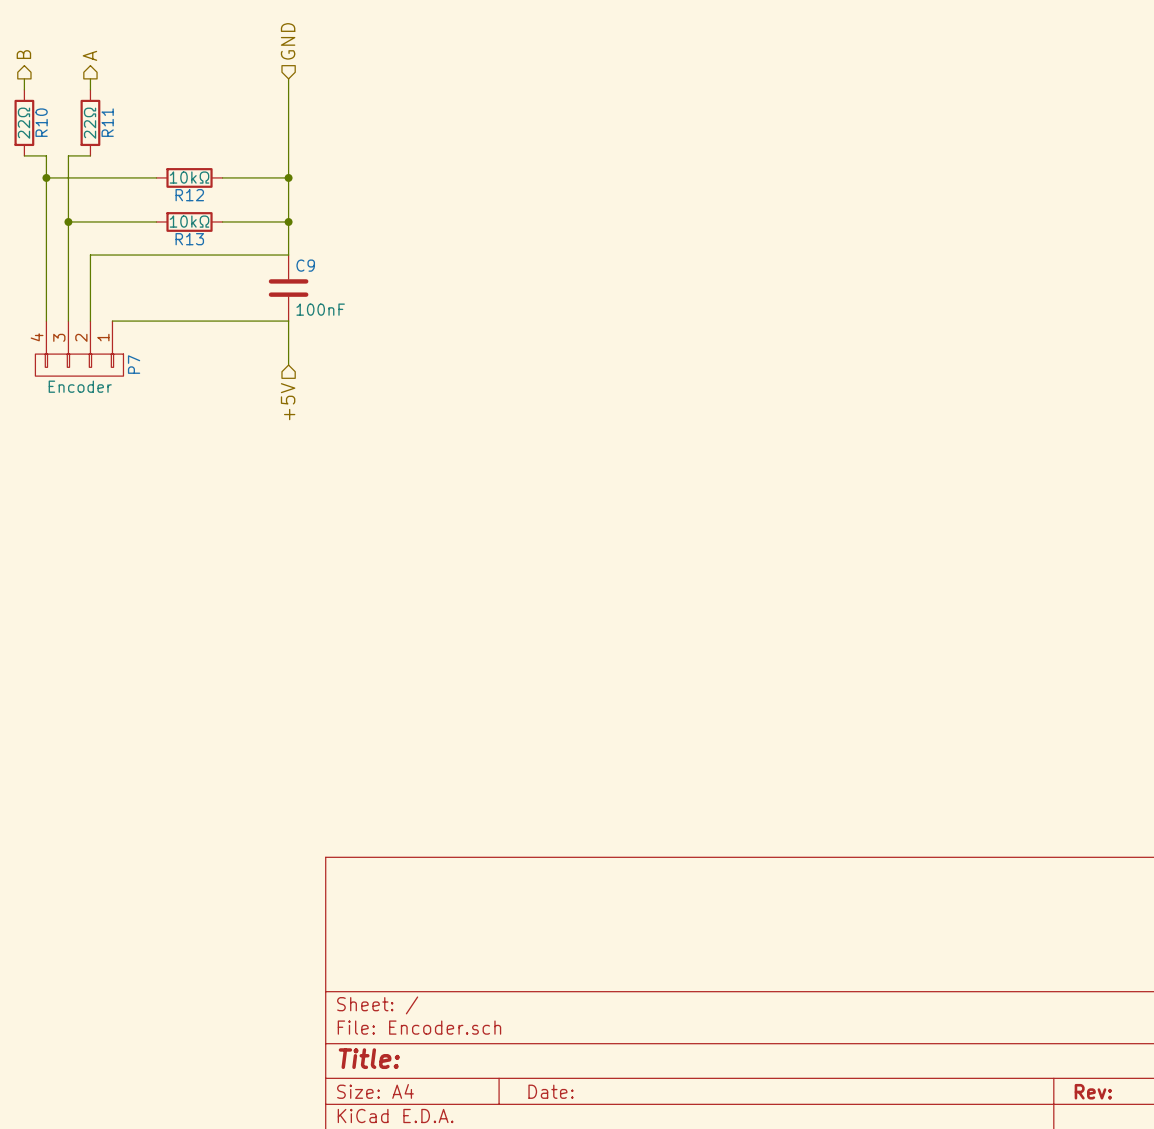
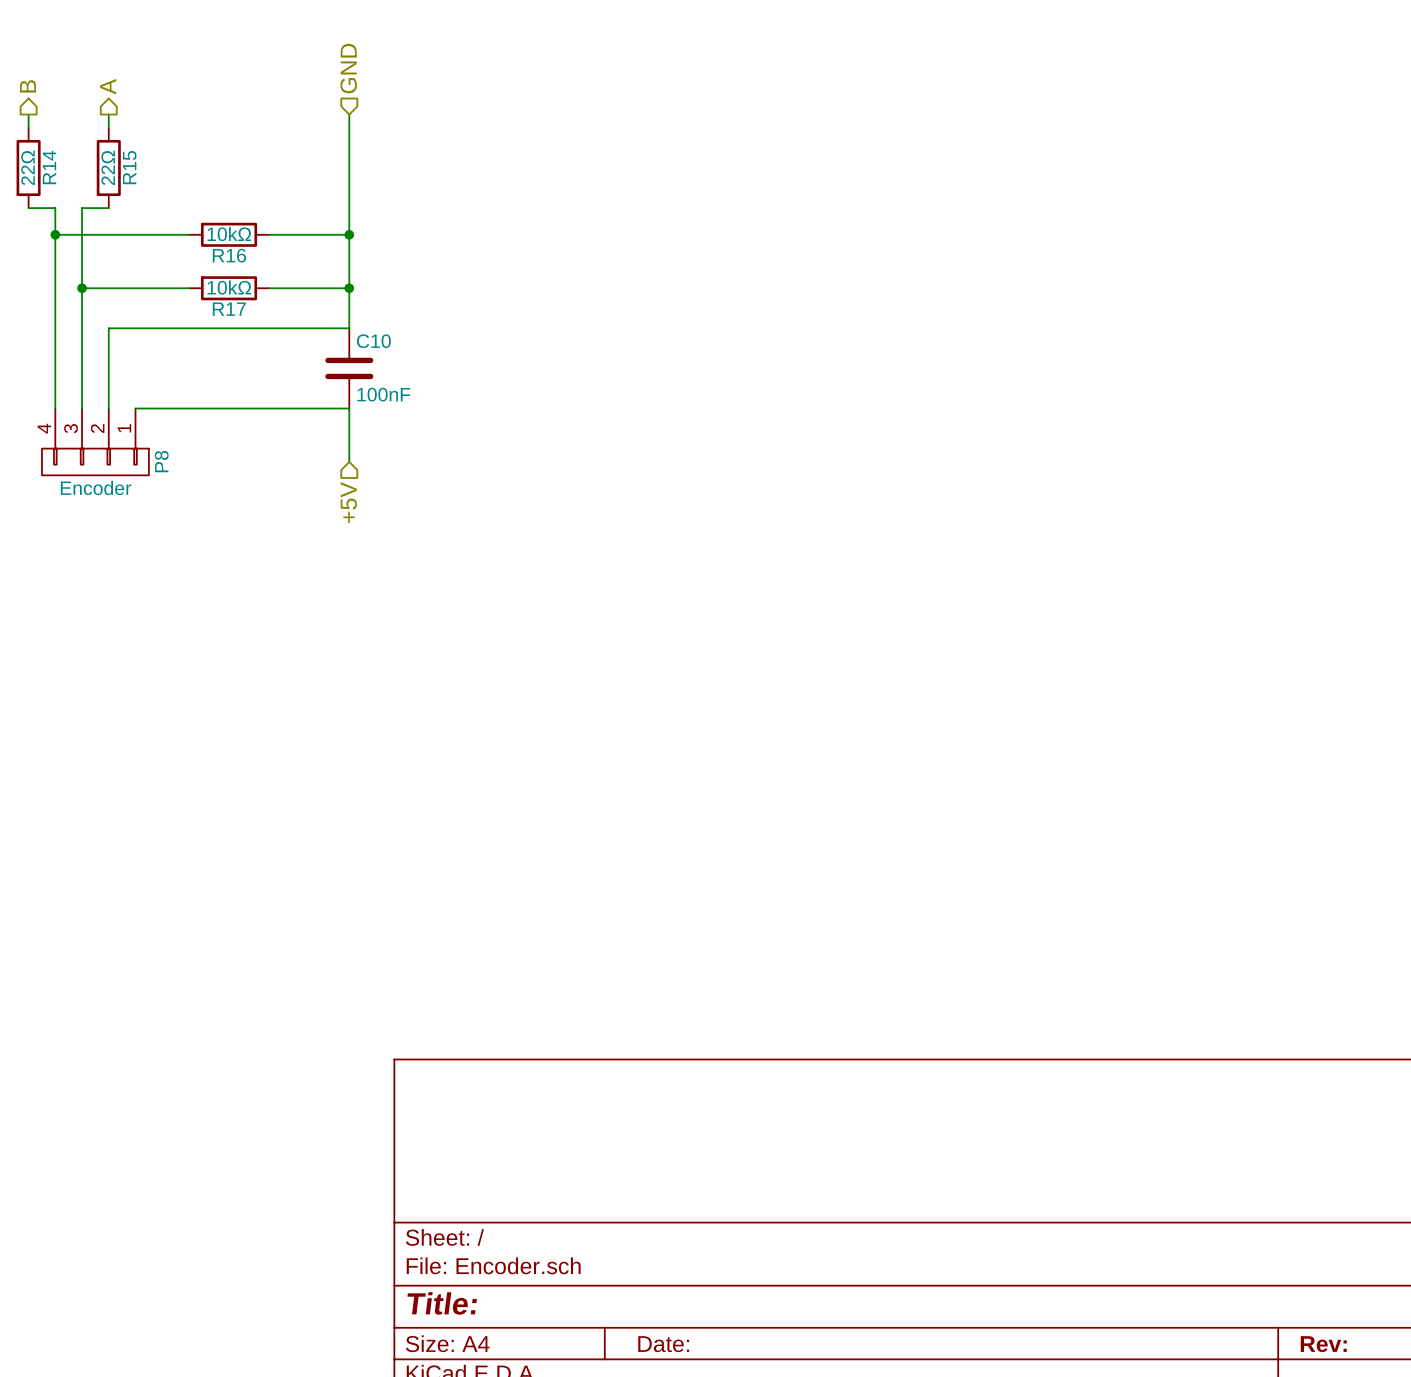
R10 name: R10 (41, 122) -> R14 (49, 167)
R11 name: R11 (107, 122) -> R15 (129, 167)
R12 name: R12 (189, 195) -> R16 (229, 255)
R13 name: R13 (189, 239) -> R17 (229, 309)
C9 name: C9 (305, 265) -> C10 (373, 341)
P7 name: P7 (134, 364) -> P8 (161, 461)

